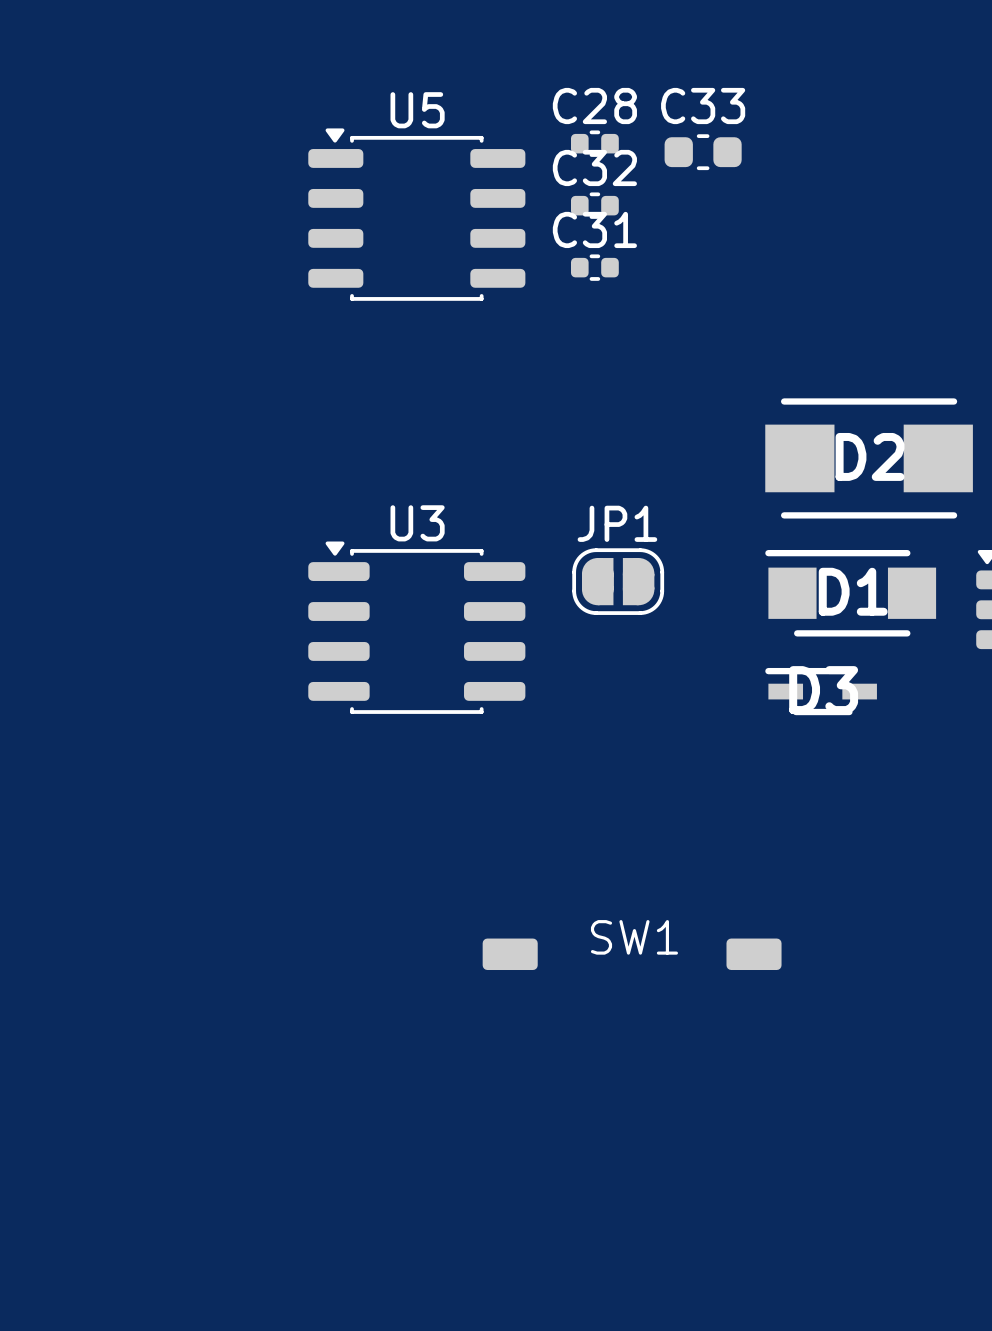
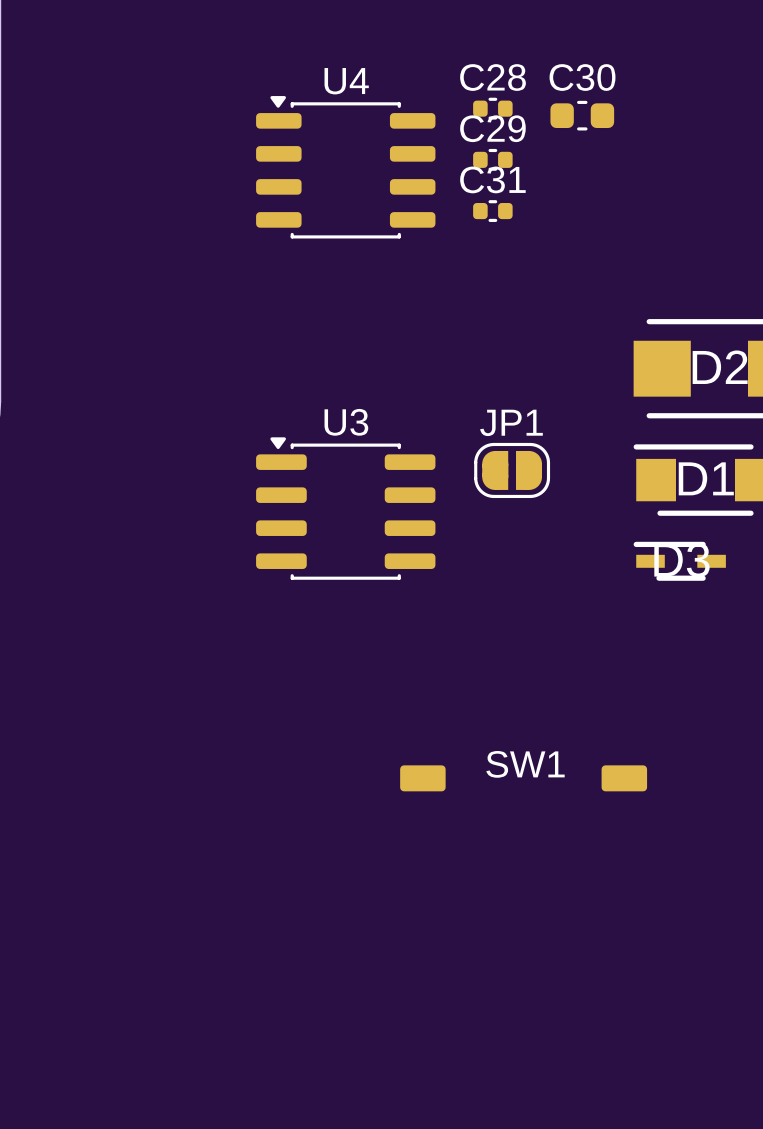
C33 name: C33 (703, 106) -> C30 (582, 77)
U5 name: U5 (417, 110) -> U4 (346, 81)
C32 name: C32 (594, 167) -> C29 (492, 128)

